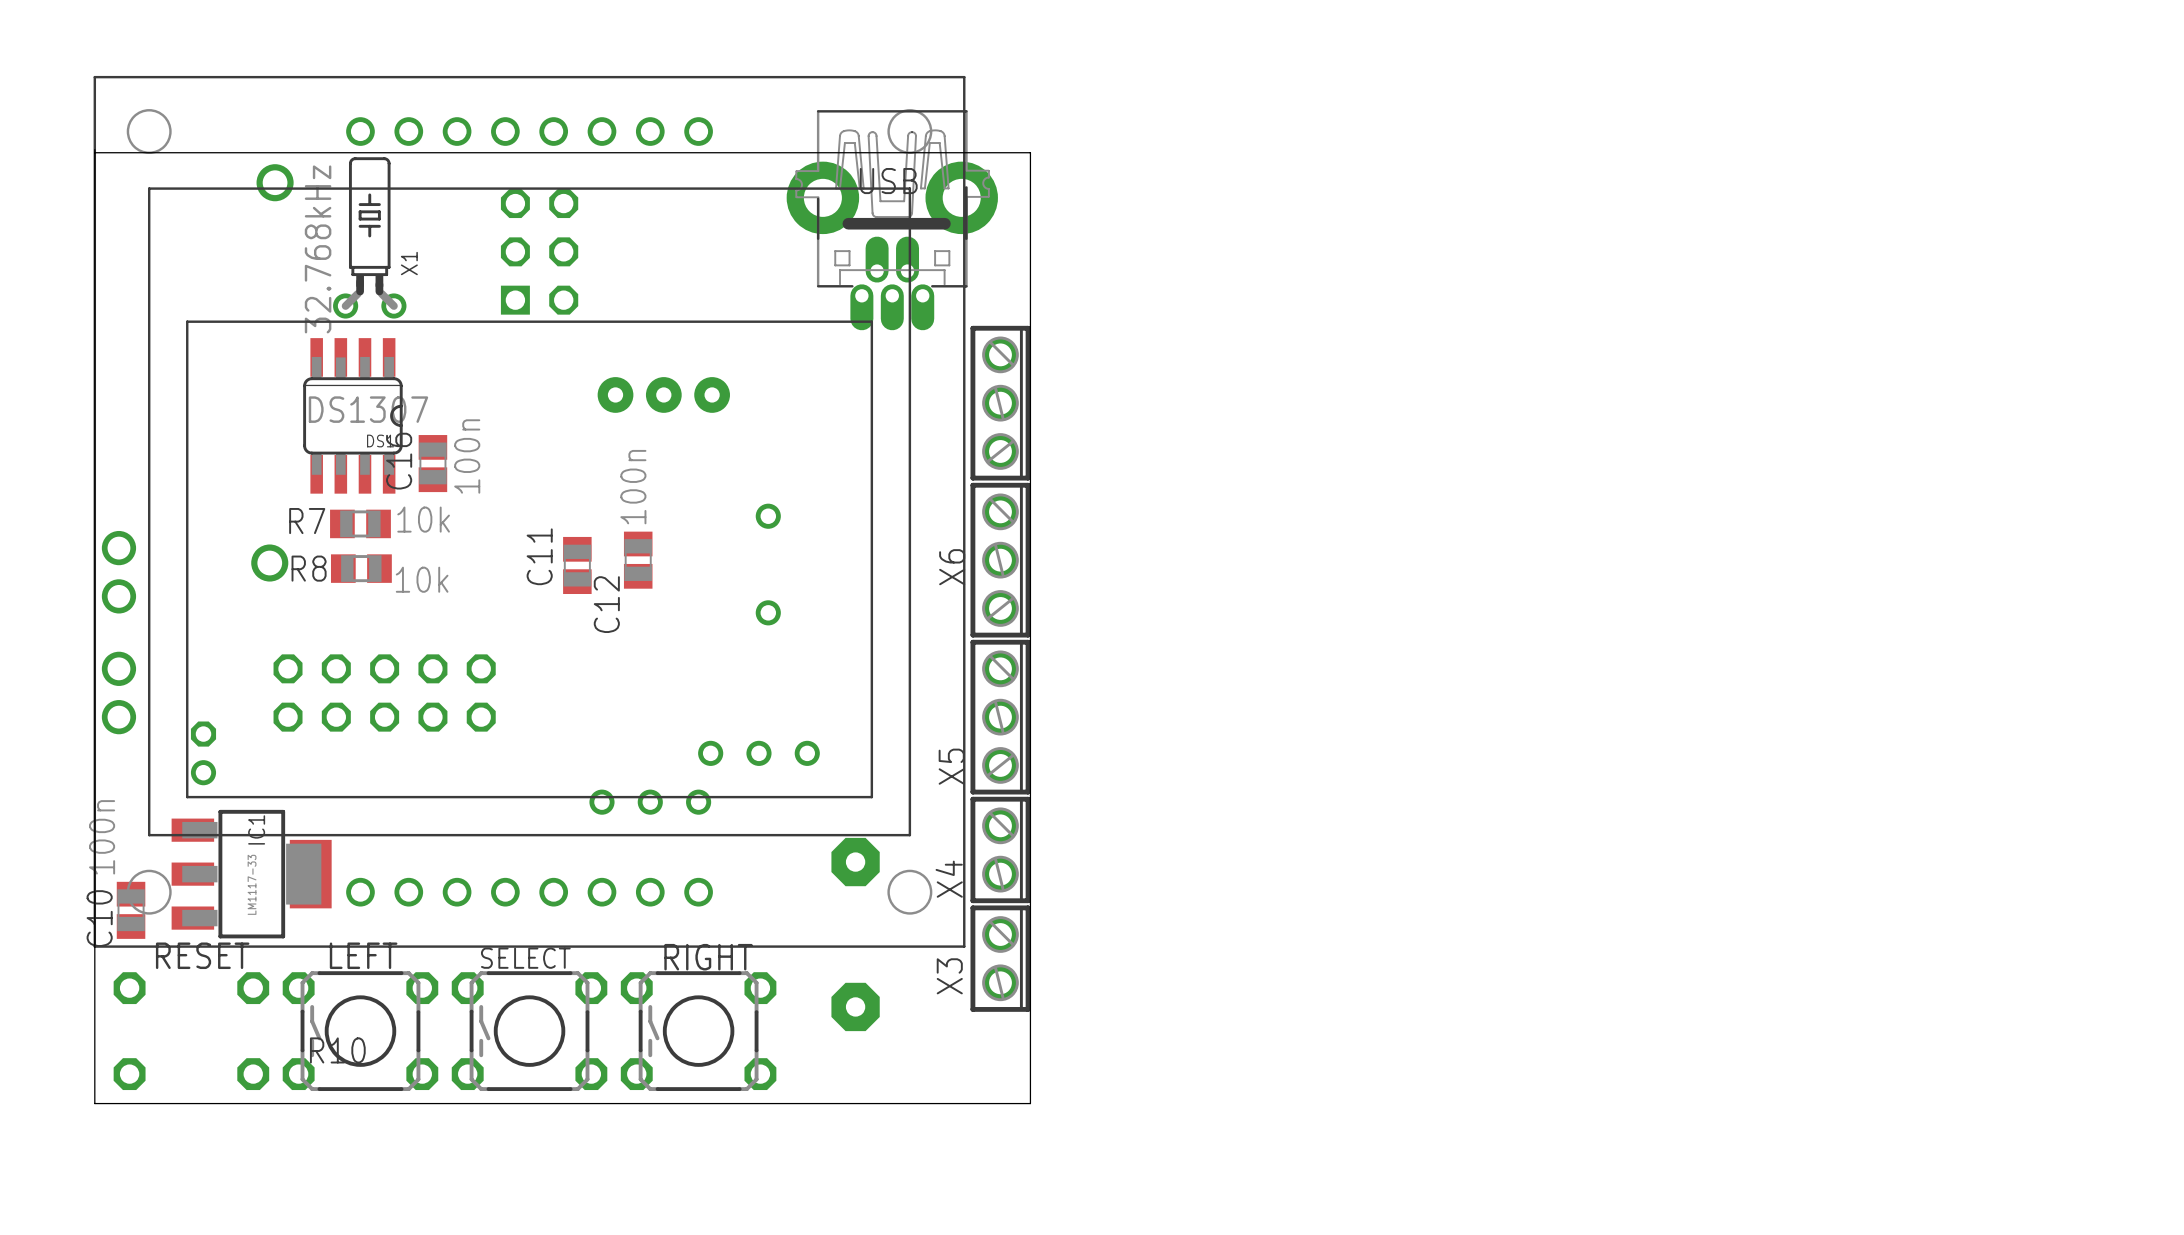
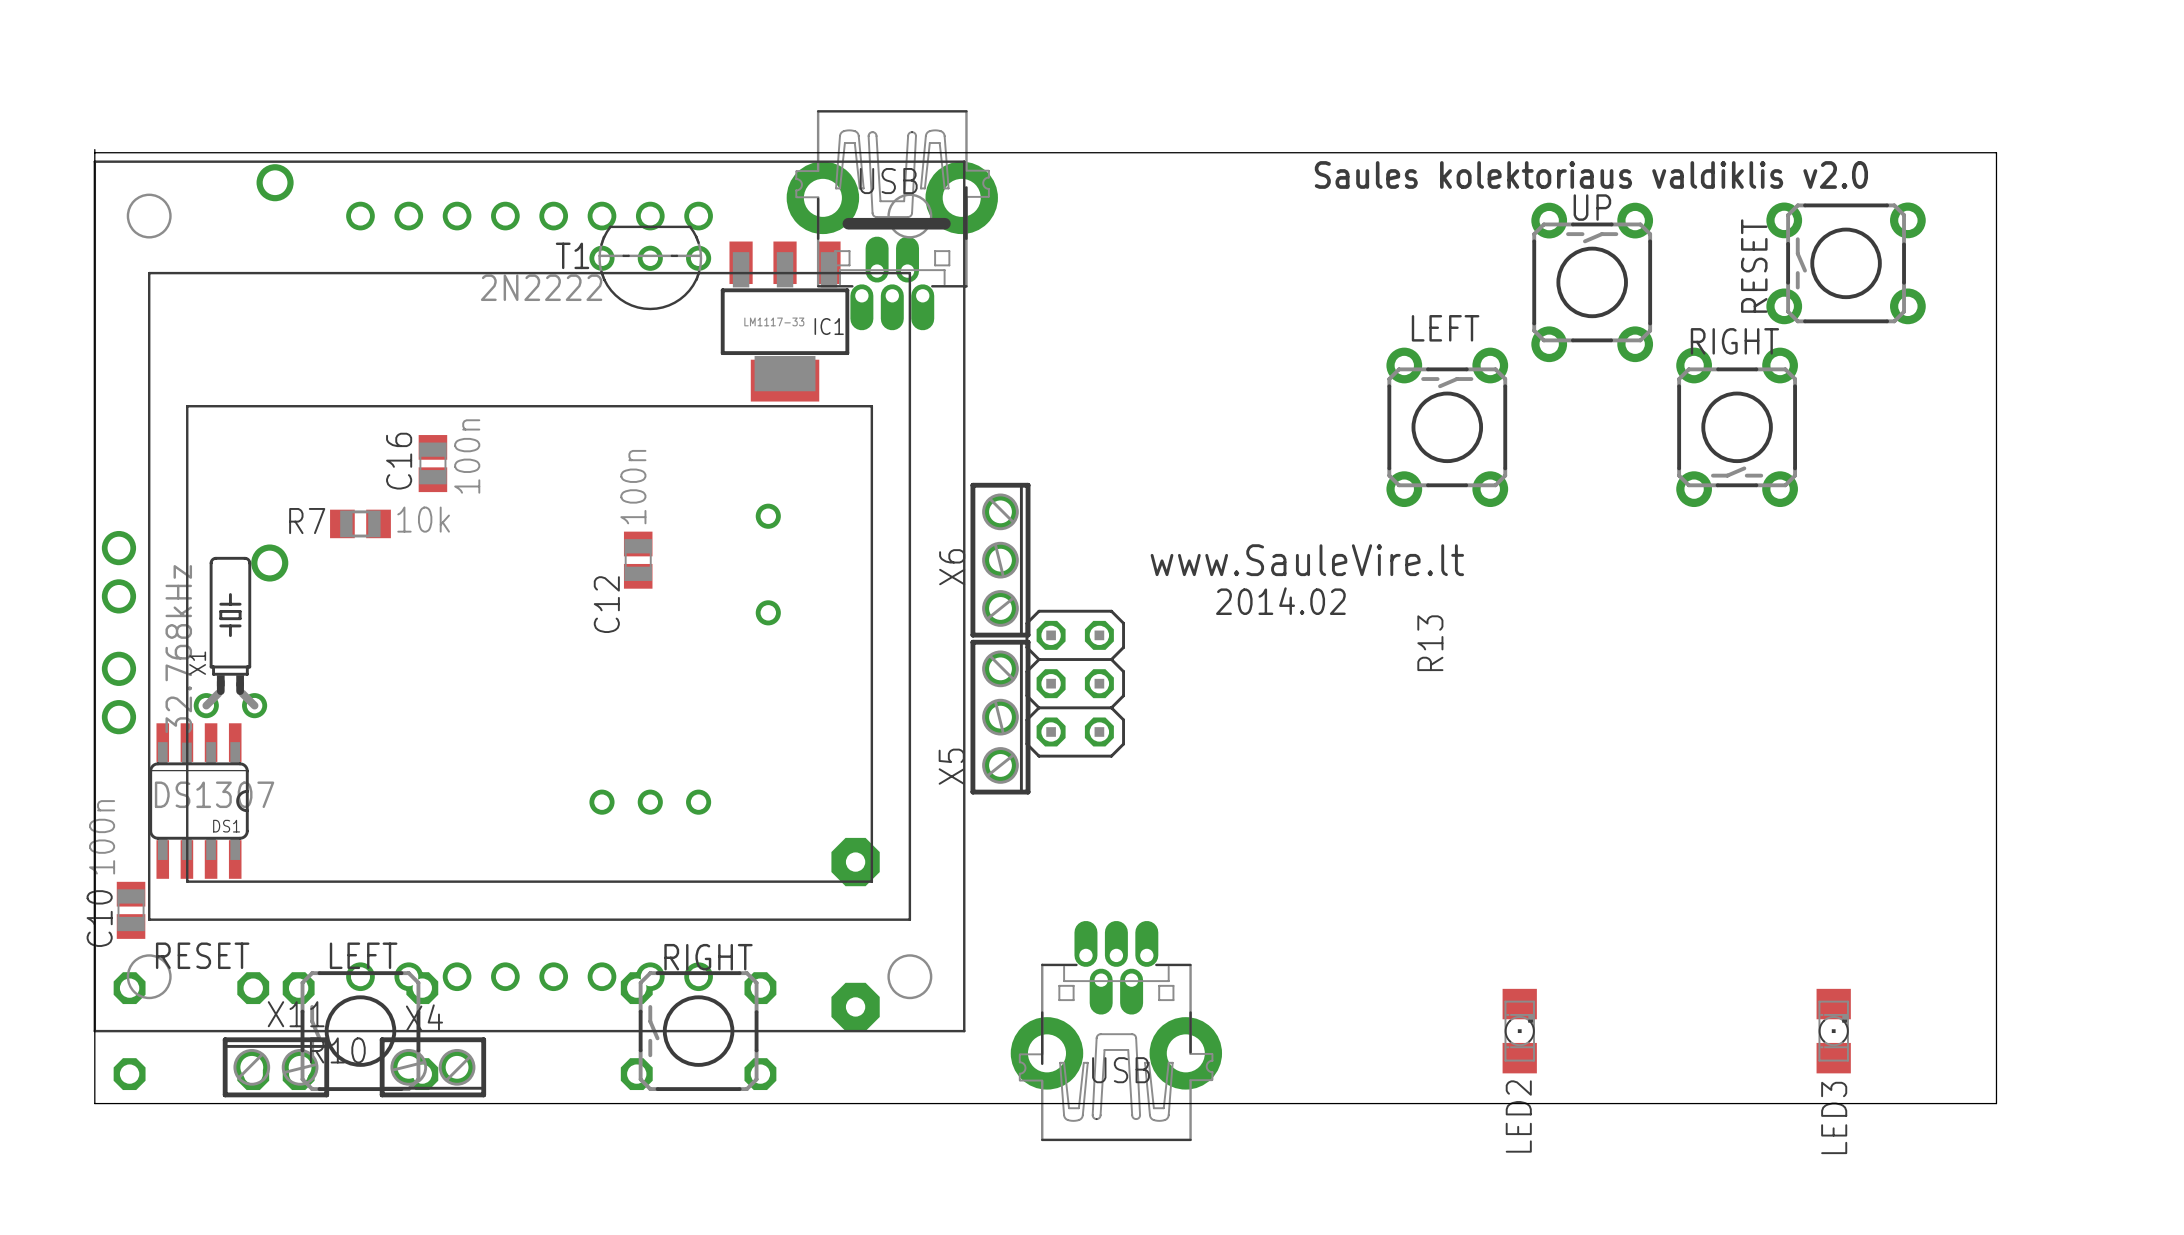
board edge: (1030, 152) (1030, 1103) -> (1030, 152) (1996, 152) (1996, 1103) (1030, 1103)
text: none -> Saules kolektoriaus valdiklis v2.0 (1591, 174)
X1 position: (369, 237) -> (230, 637)
part: (539, 251) -> none
X1 name position: X1 (409, 263) -> X1 (197, 663)
RESET: none -> (1846, 263)
T1: none -> 2N2222 (650, 267)
UP: none -> (1592, 282)
part: (663, 394) -> none
part: (1000, 403) -> none
DS1 position: (352, 415) -> (198, 801)
LEFT: none -> (1447, 427)
RIGHT: none -> (1737, 427)
part position: (529, 511) -> (529, 596)
text: none -> www.SauleVire.lt (1307, 560)
C11: (577, 565) -> none
R8: 10k (361, 568) -> none
text: none -> 2014.02 (1280, 601)
R13: none -> (1430, 643)
part: none -> (1075, 683)
part: (384, 692) -> none
part: (203, 753) -> none
part: (758, 753) -> none
X4 rotation: 0° (1000, 849) -> 90° clockwise (432, 1067)
X4 position: (1000, 849) -> (432, 1067)
IC1 rotation: 0° (251, 874) -> 90° clockwise (785, 321)
IC1 position: (251, 874) -> (785, 321)
X3: (1000, 958) -> none
SELECT: (529, 1031) -> none
USB: none -> (1116, 1031)
LED2: none -> (1519, 1031)
LED3: none -> (1833, 1031)
X11: none -> (275, 1067)

